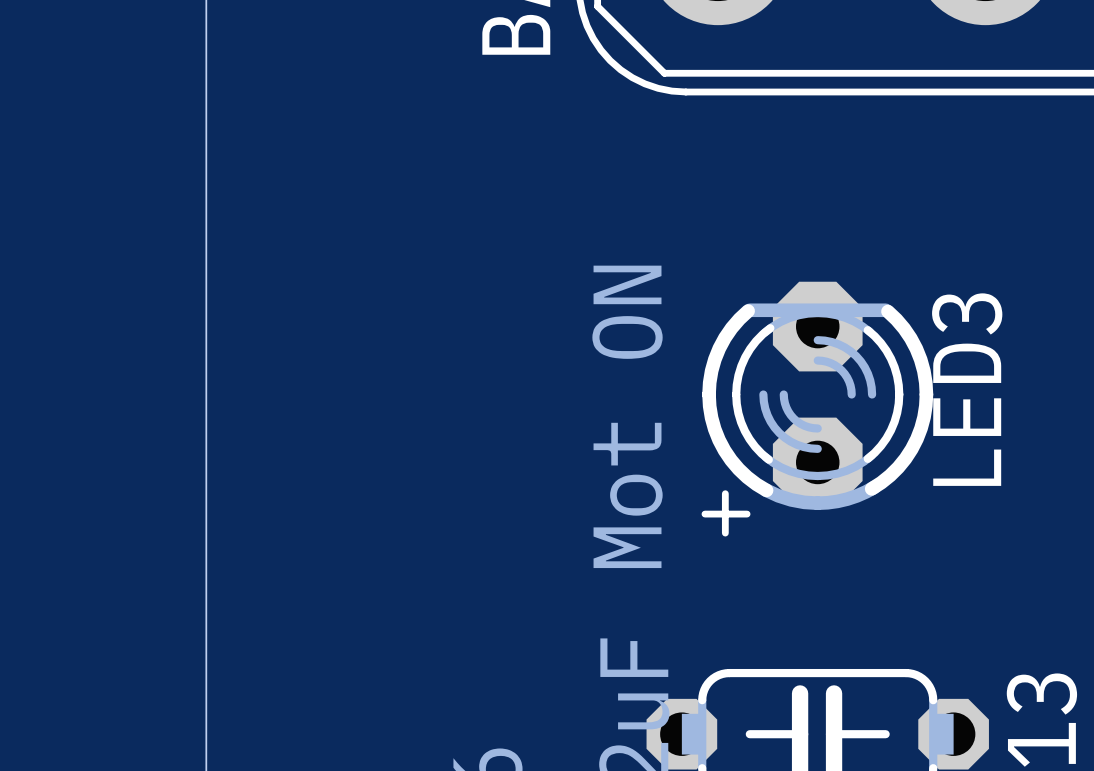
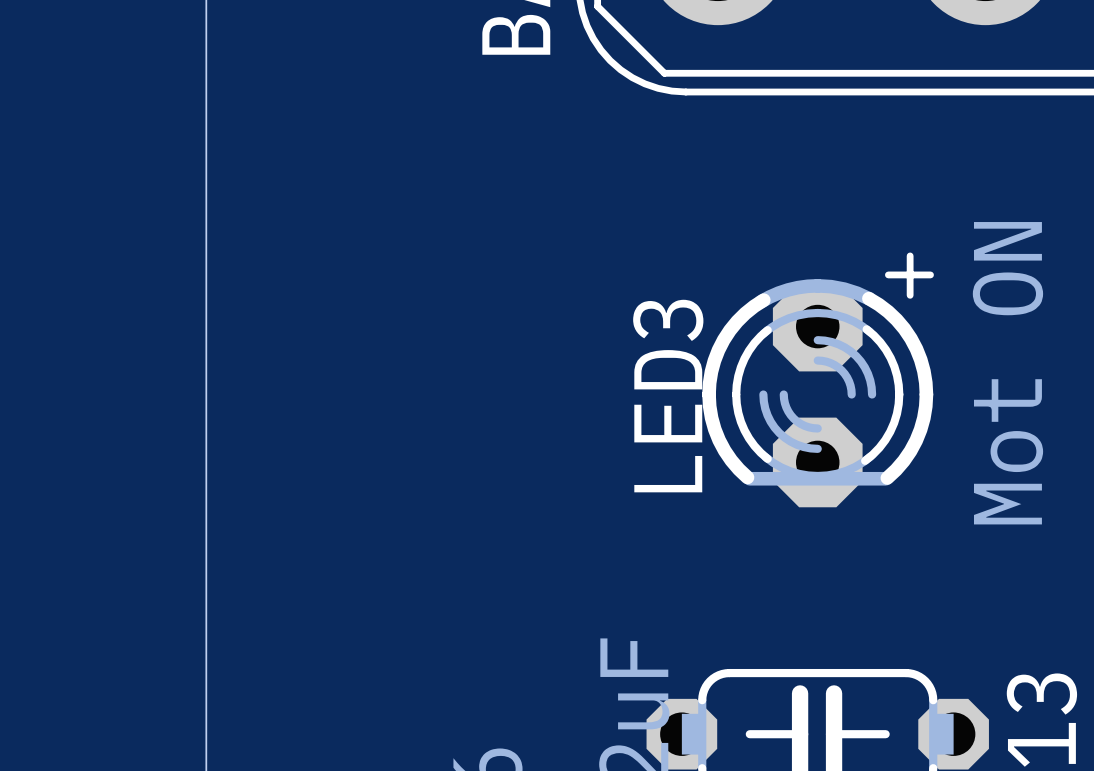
LED3 rotation: 0° (817, 409) -> 180° (818, 379)

